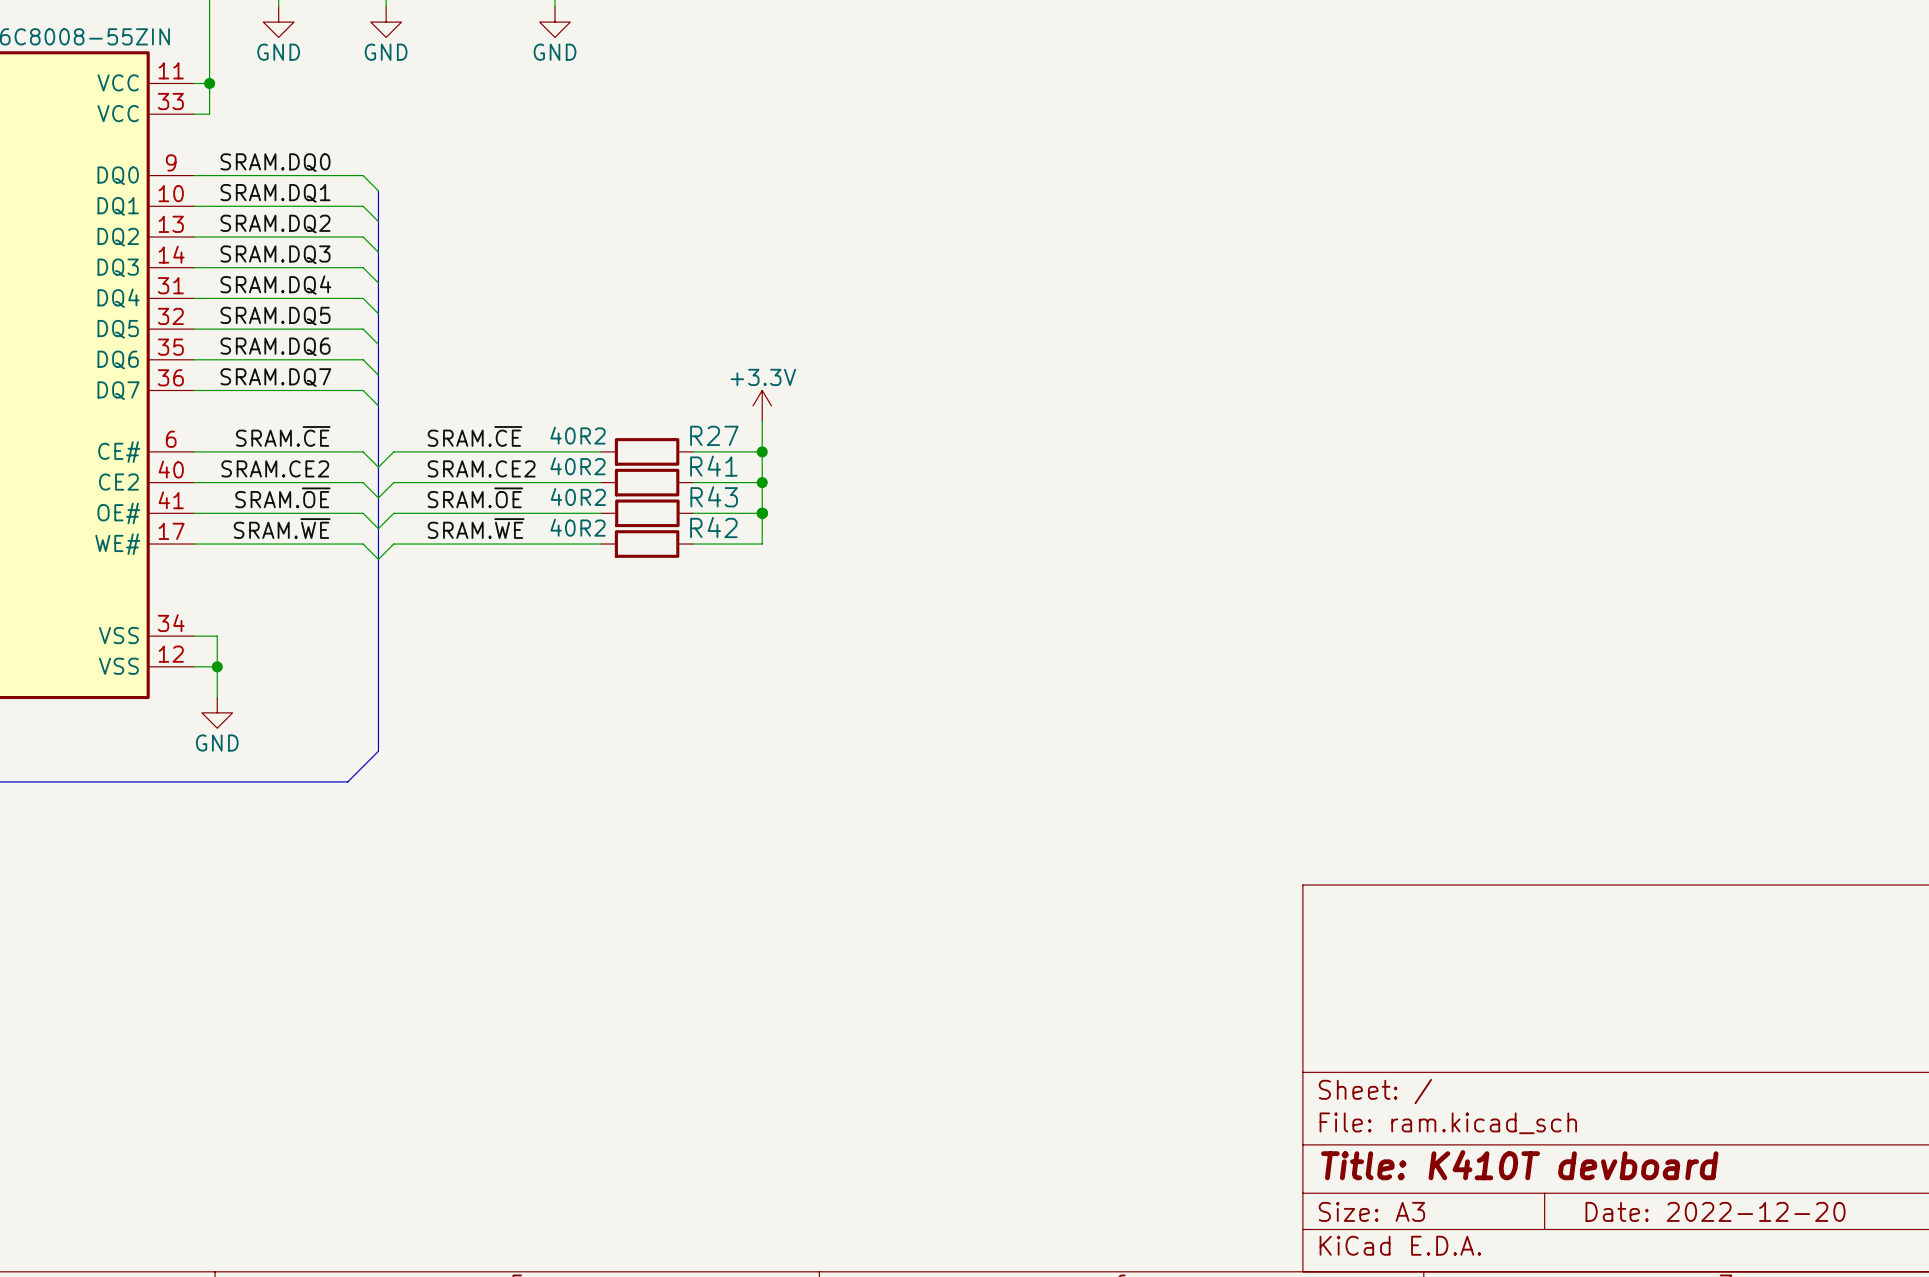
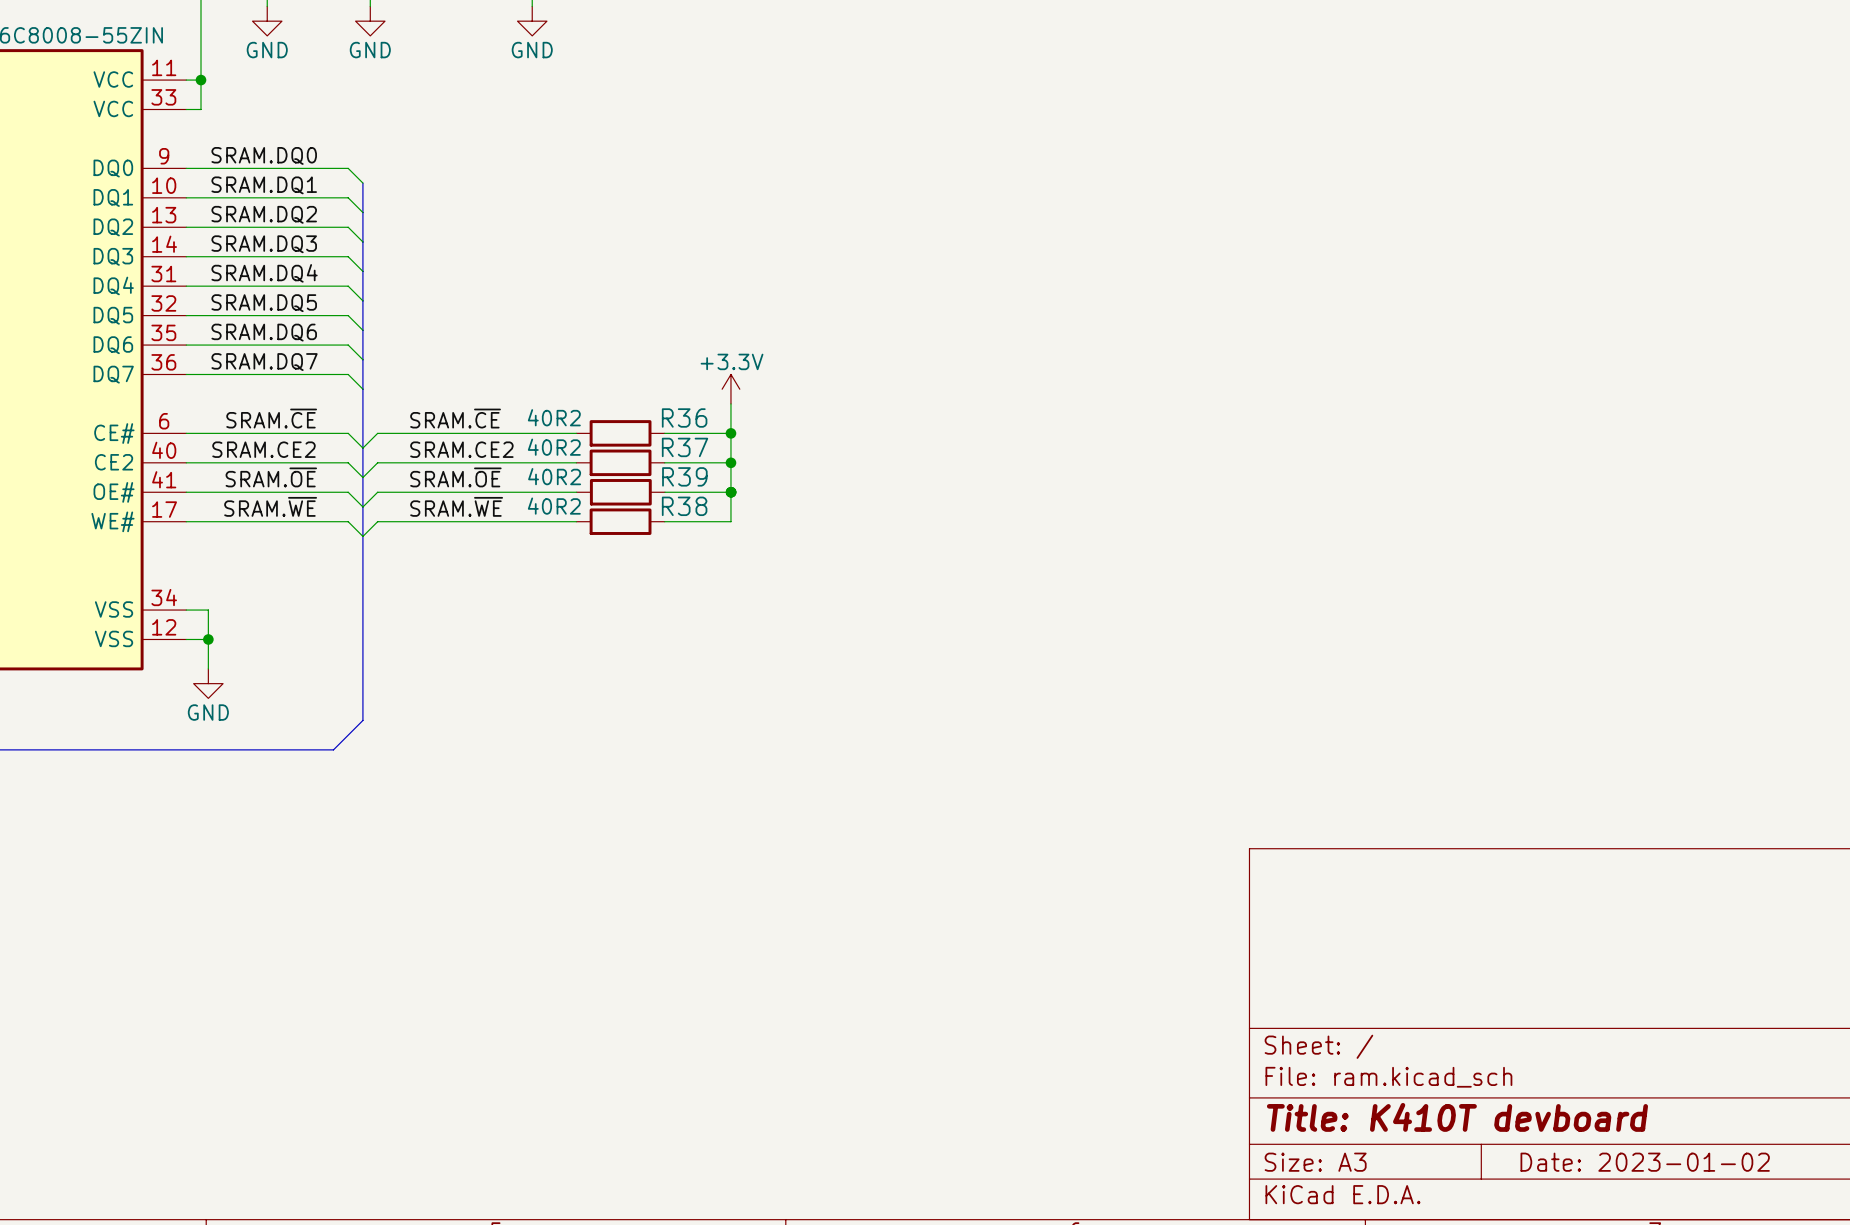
R27 name: R27 (714, 435) -> R36 (684, 417)
R41 name: R41 (713, 466) -> R37 (685, 447)
R43 name: R43 (714, 496) -> R39 (684, 476)
R42 name: R42 (713, 527) -> R38 (684, 506)
title block: Date: 2022-12-20 (1715, 1211) -> Date: 2023-01-02 (1645, 1162)

